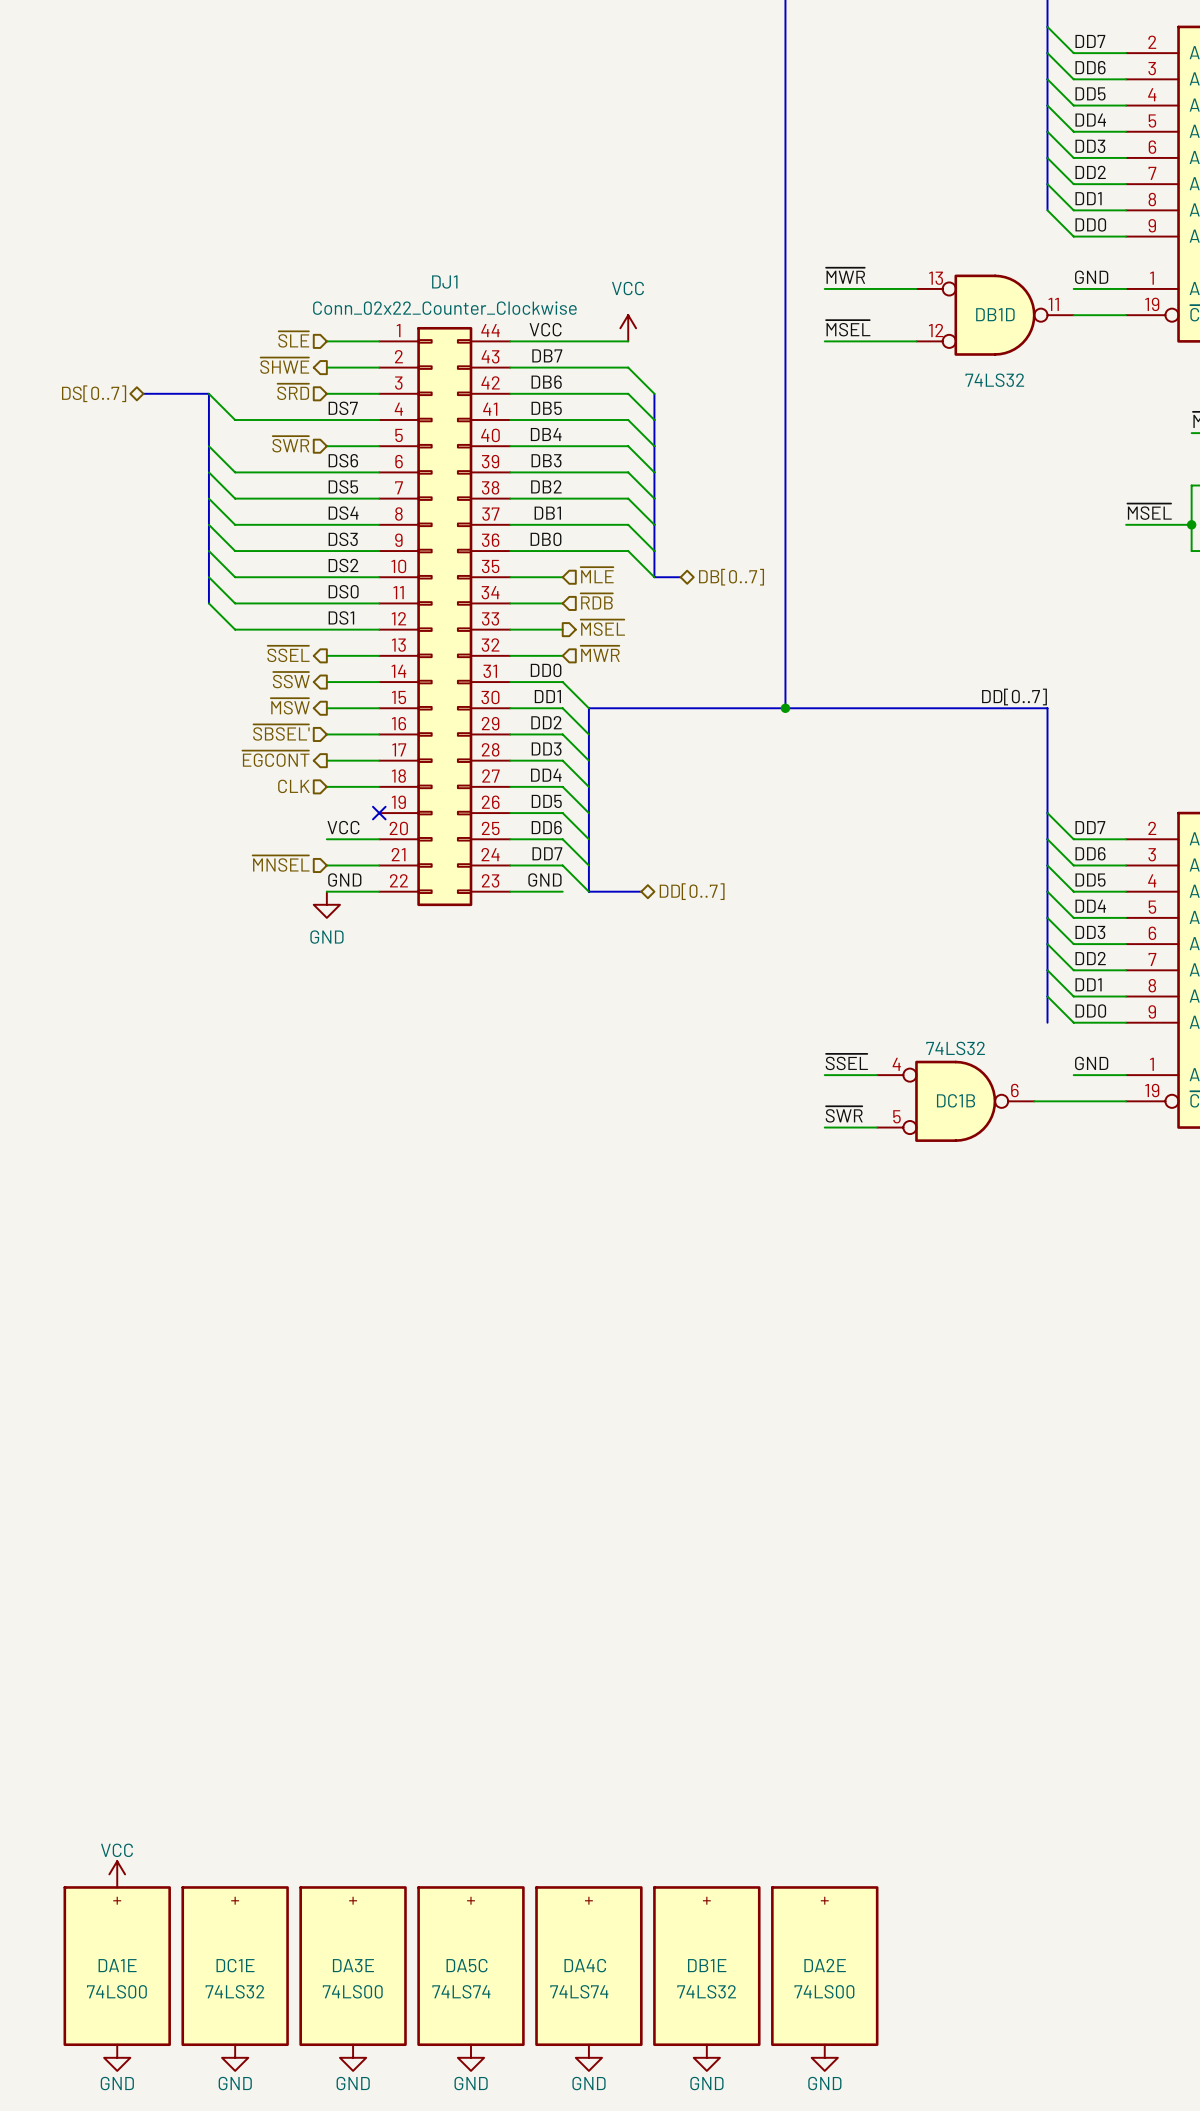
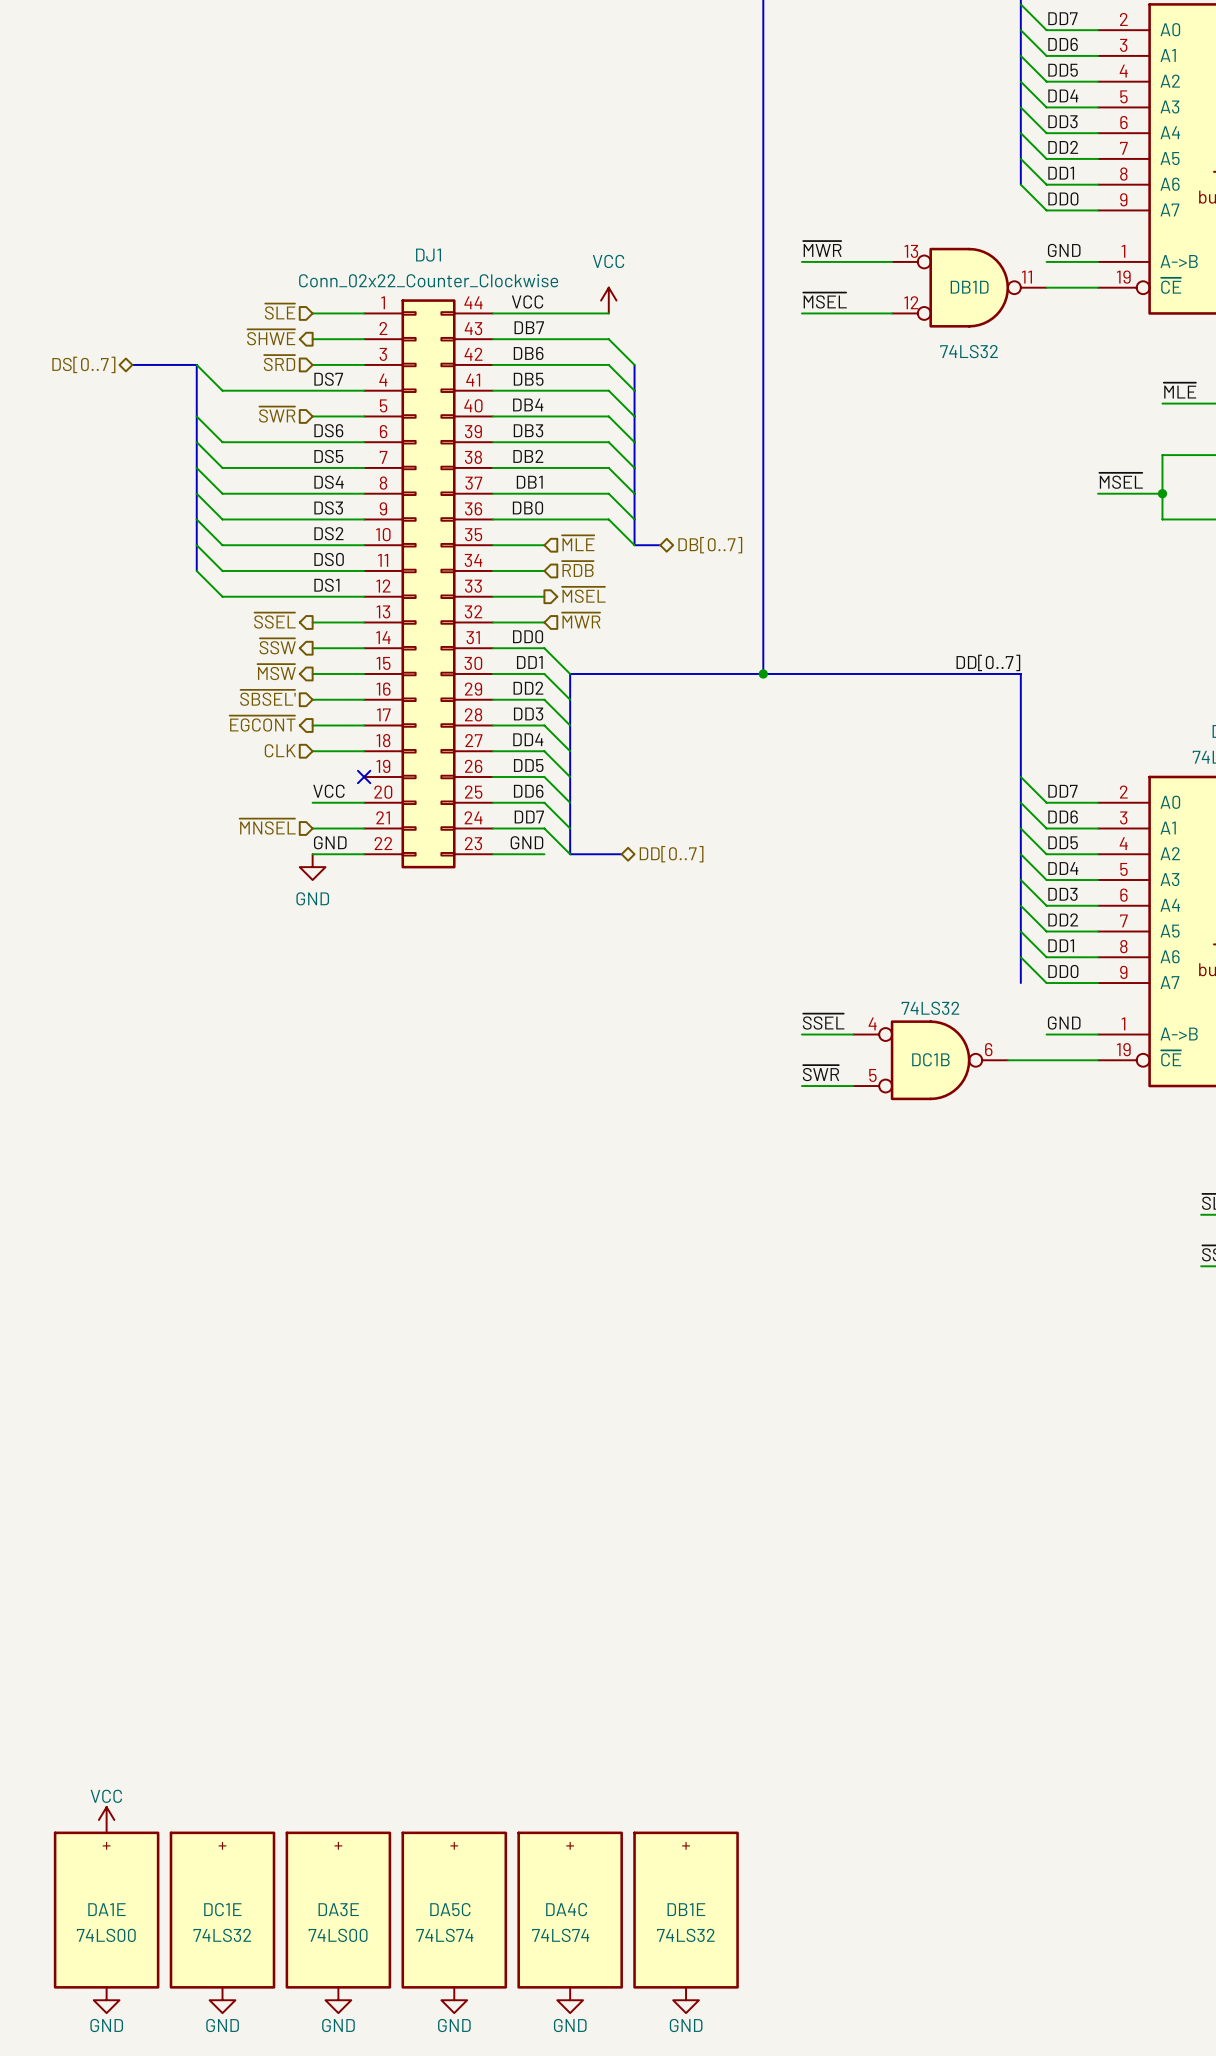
DA2E: 74LS00 (824, 1966) -> none
power symbol: GND (824, 2057) -> none

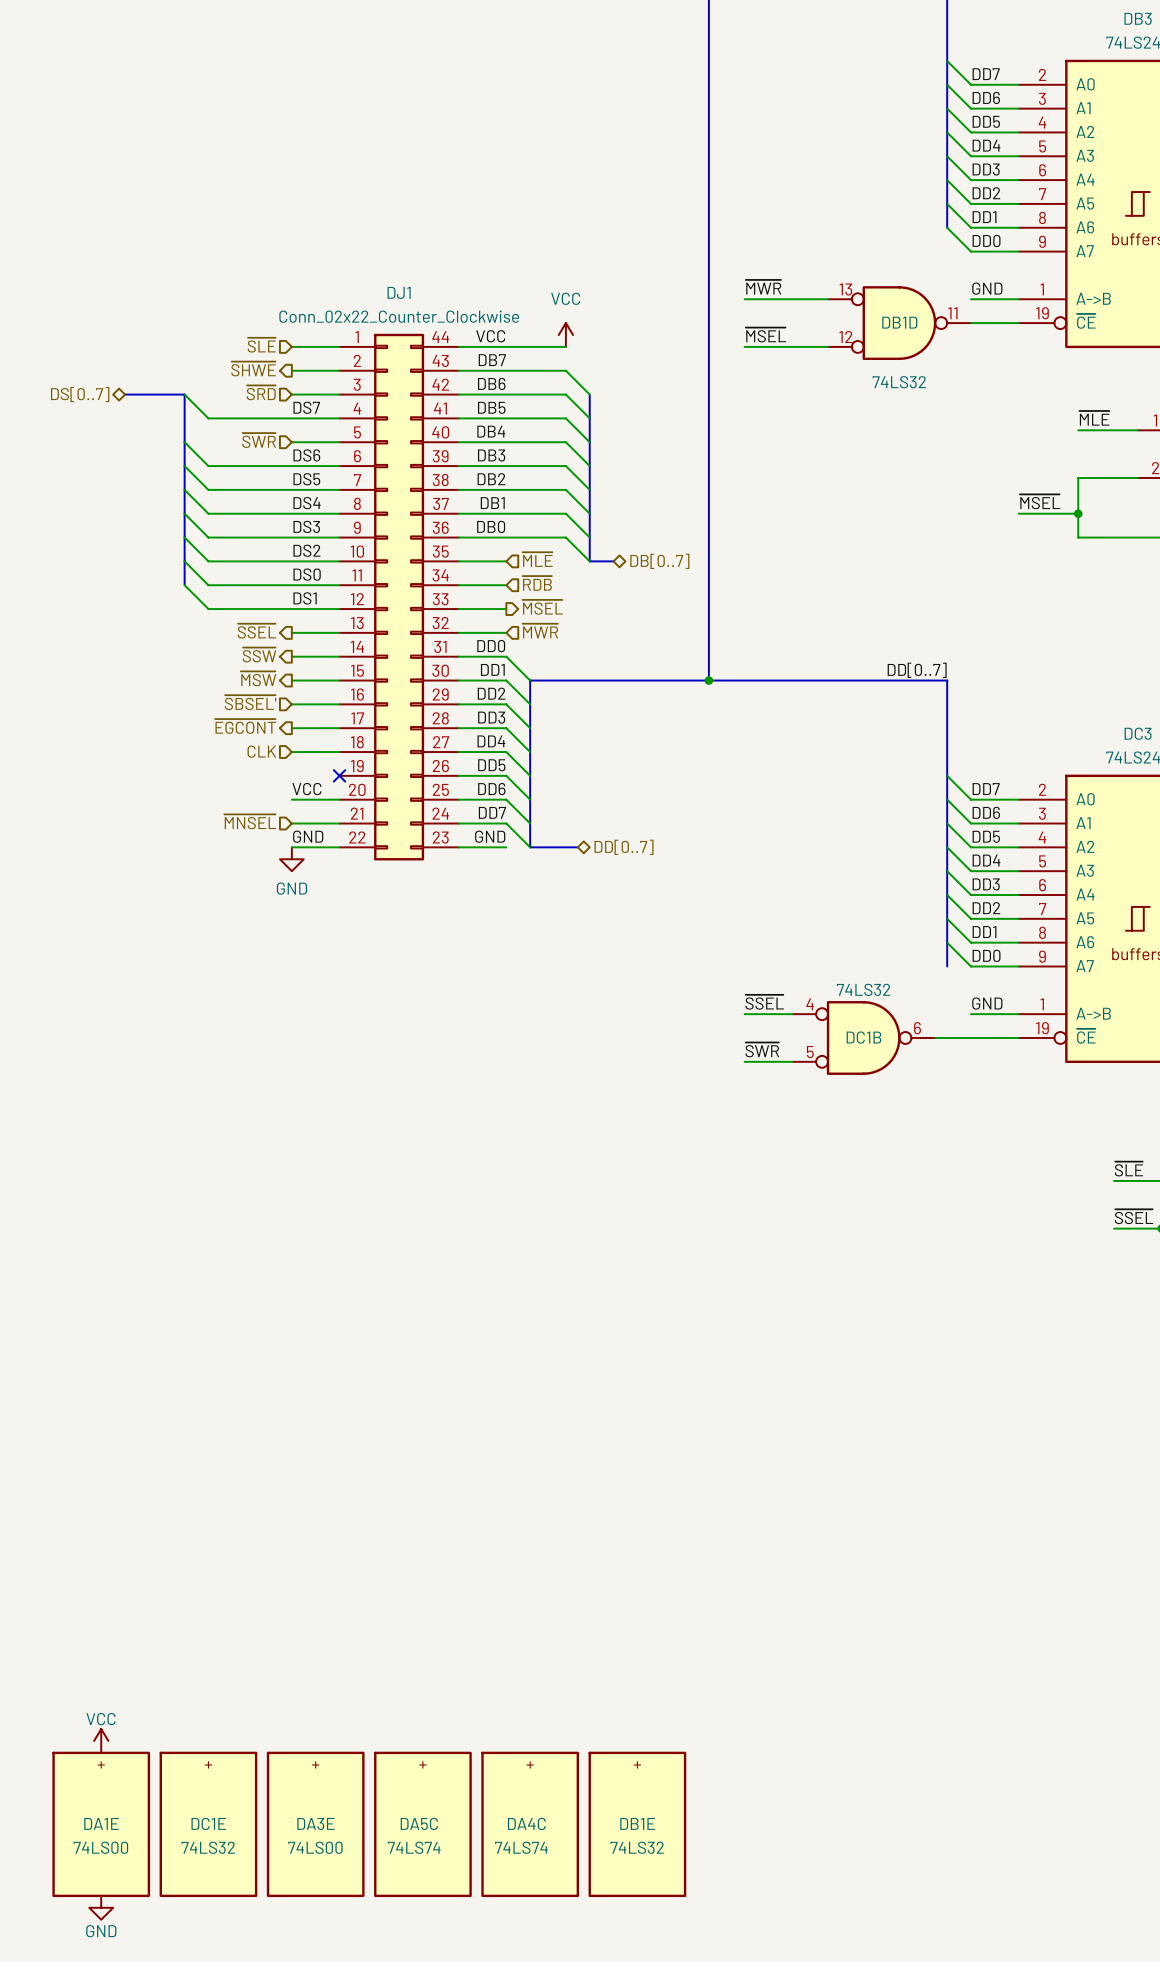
power symbol: GND (222, 2000) -> none
power symbol: GND (338, 2000) -> none
power symbol: GND (454, 2000) -> none
power symbol: GND (570, 2000) -> none
power symbol: GND (686, 2000) -> none

